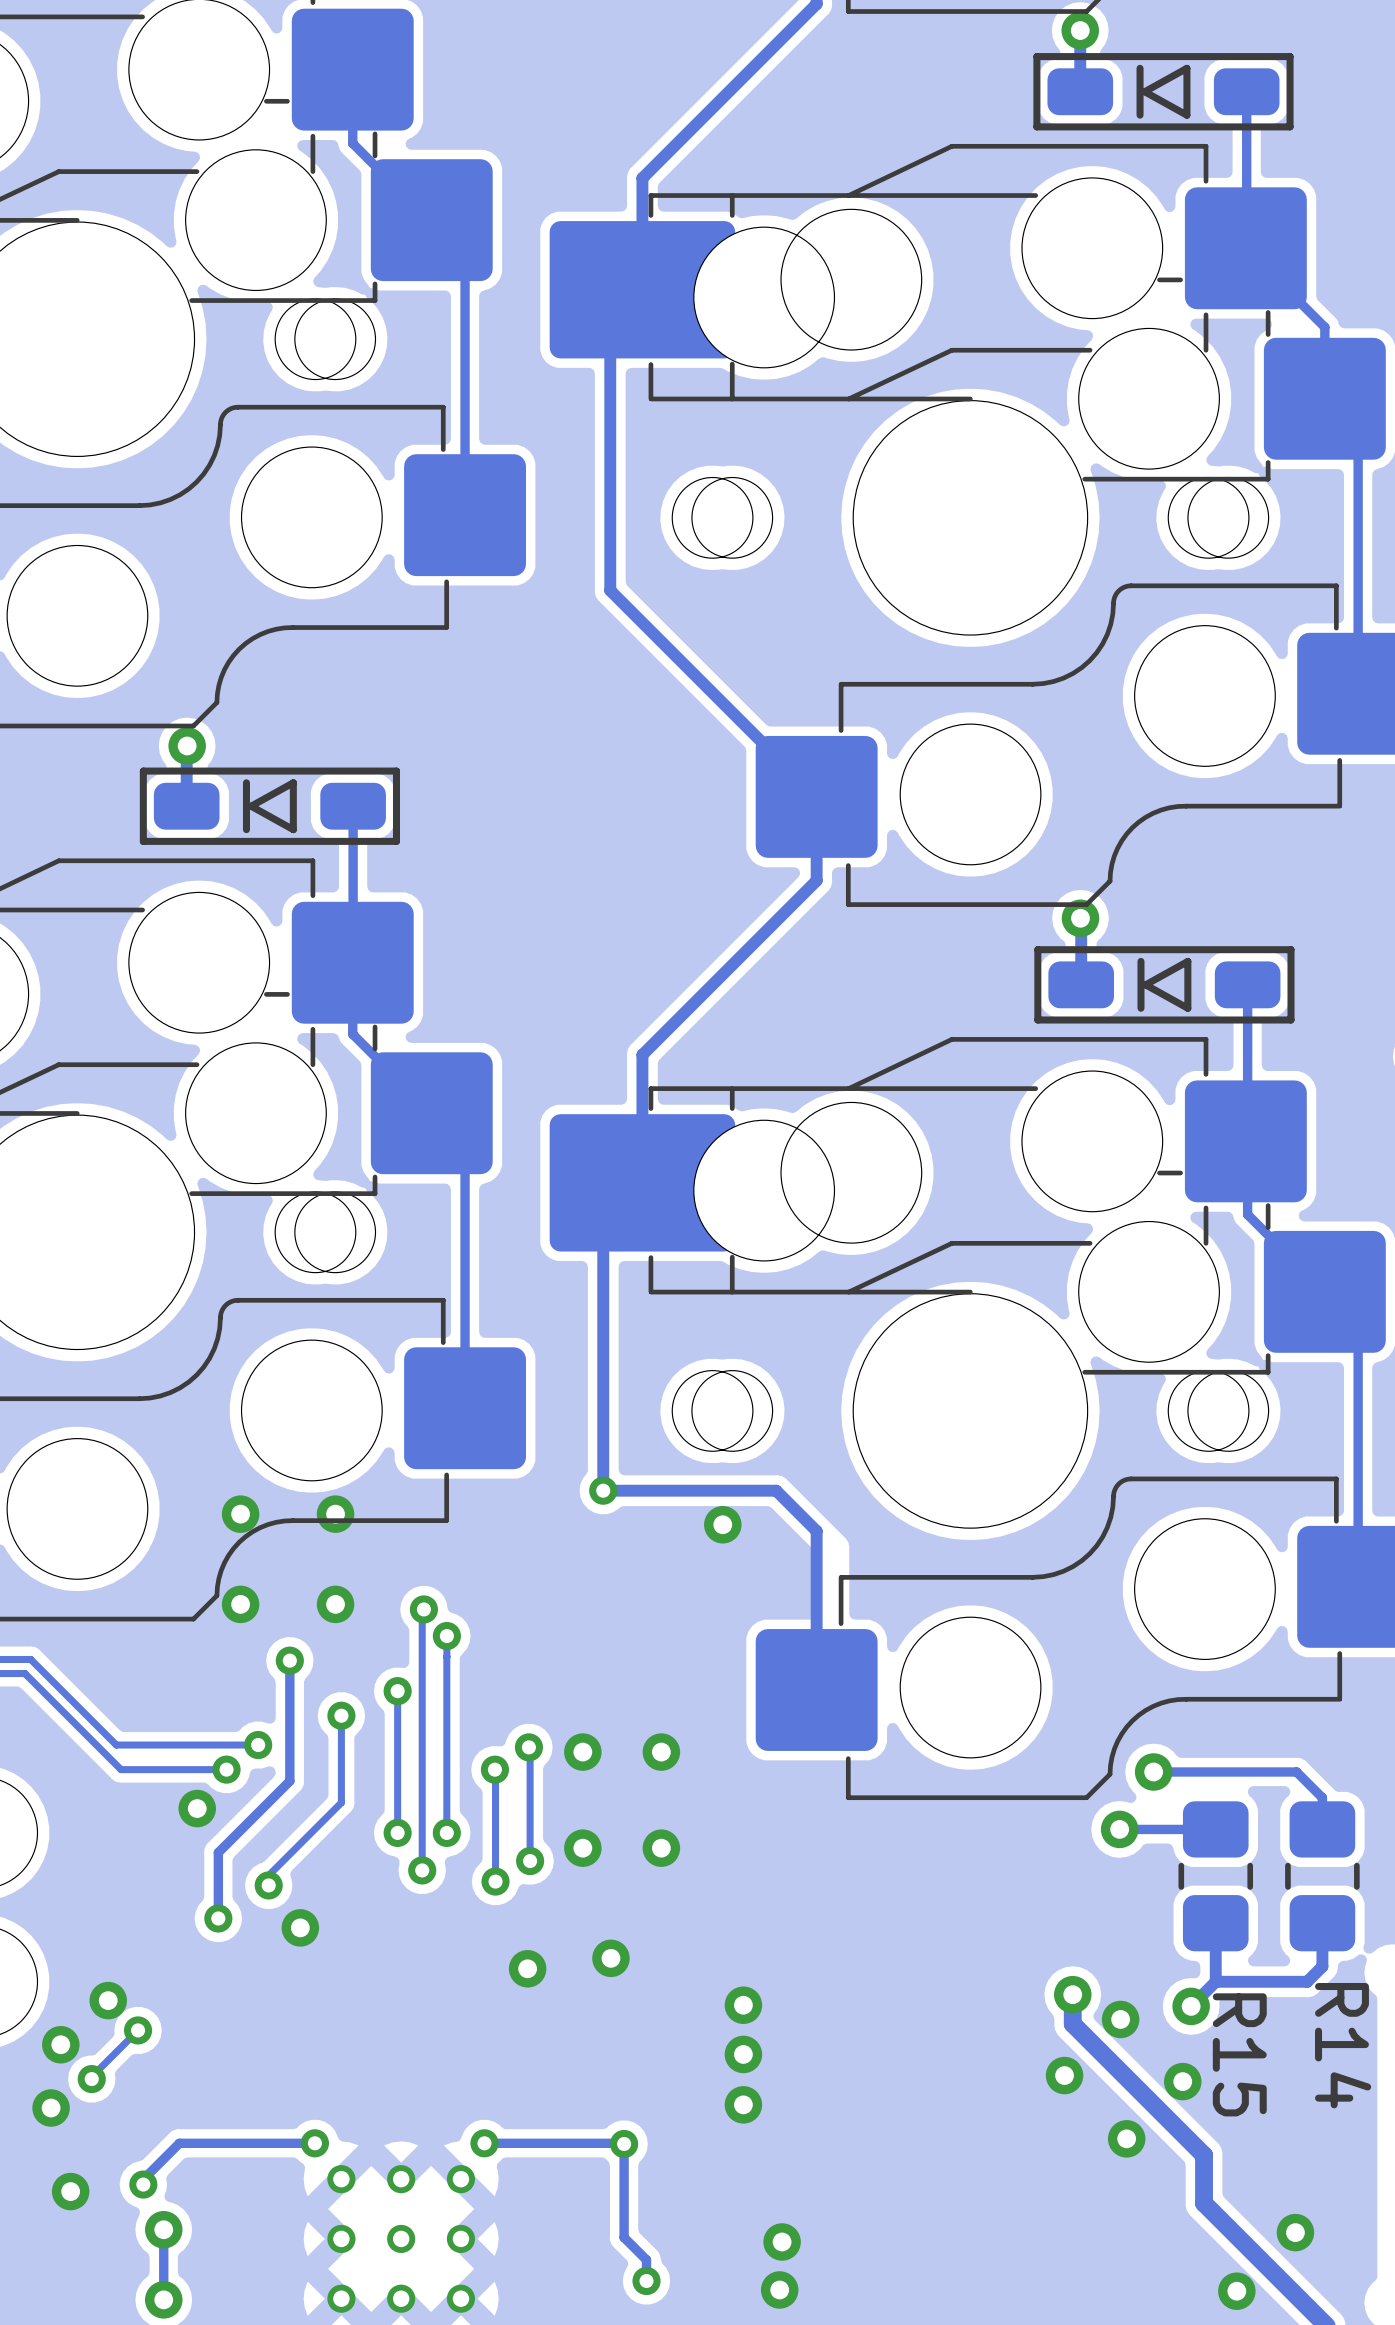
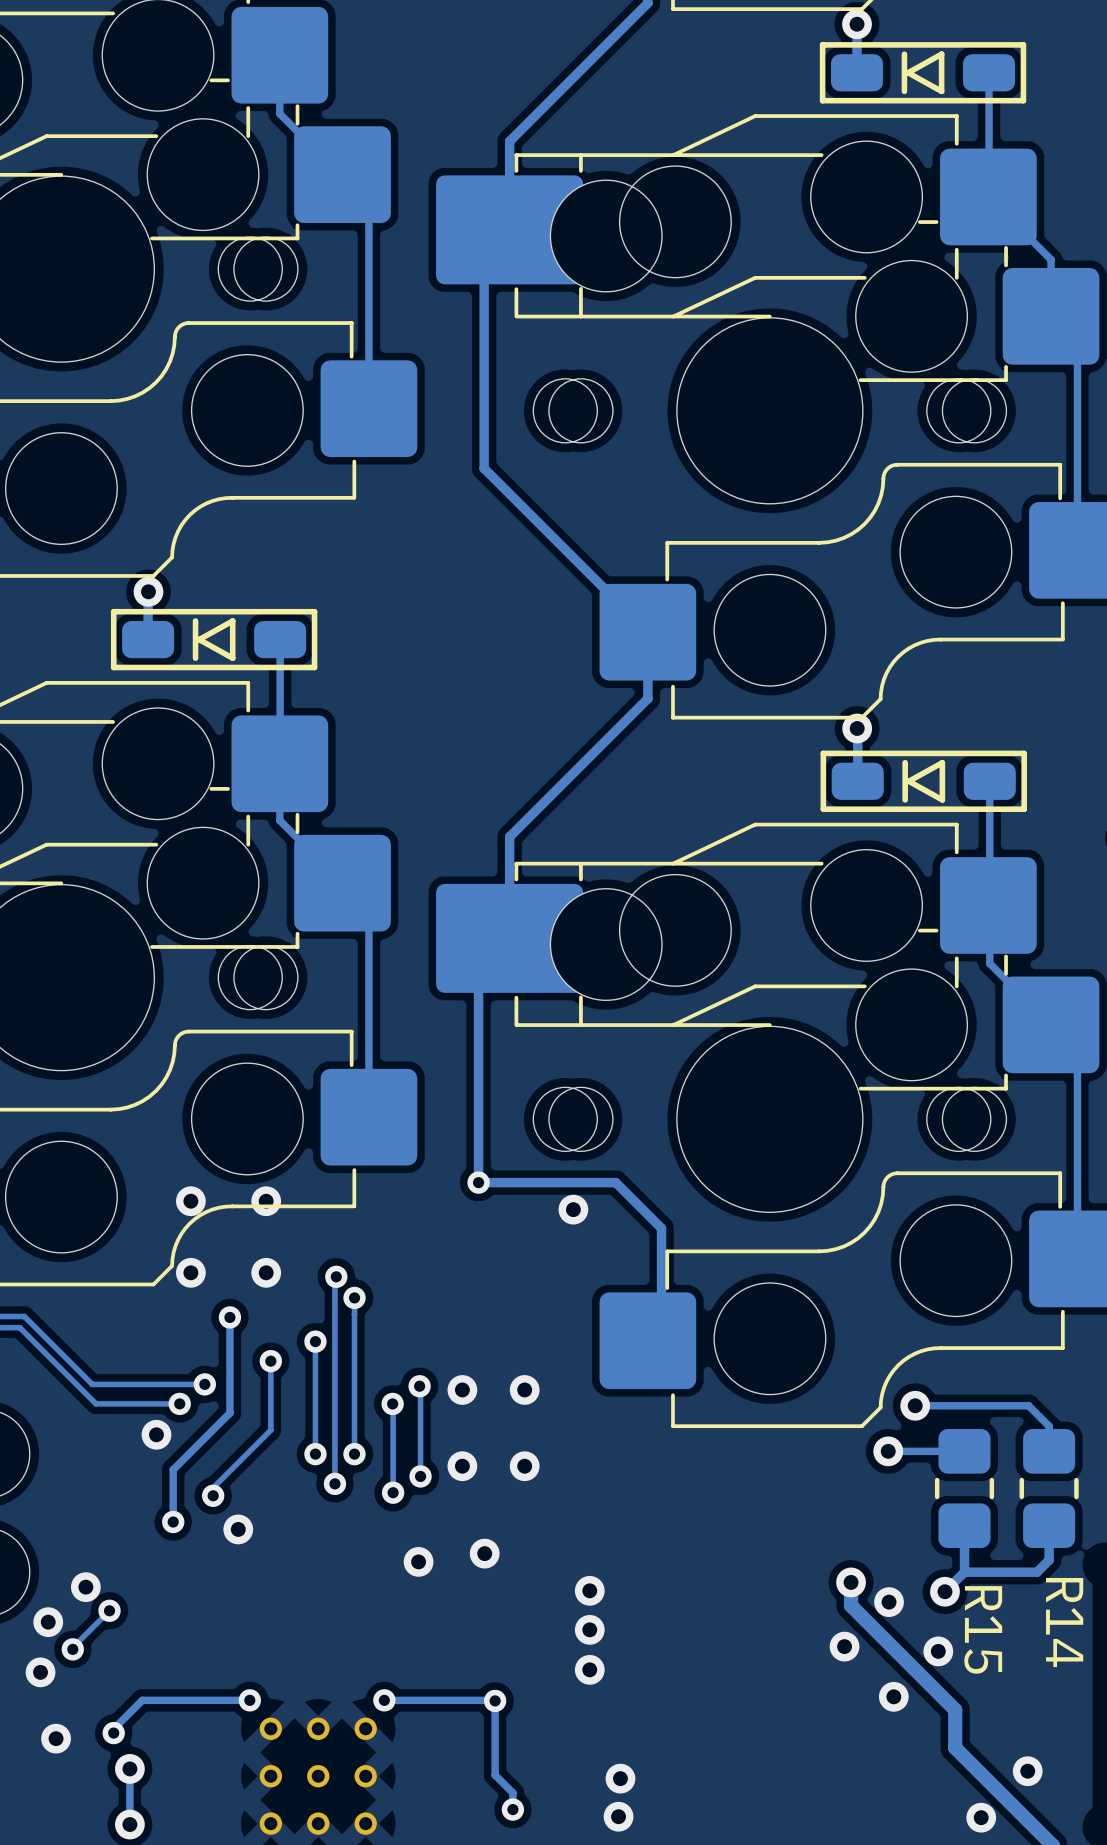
track: (816, 1531) (816, 1690) -> (647, 1214) (661, 1228) (661, 1372)

